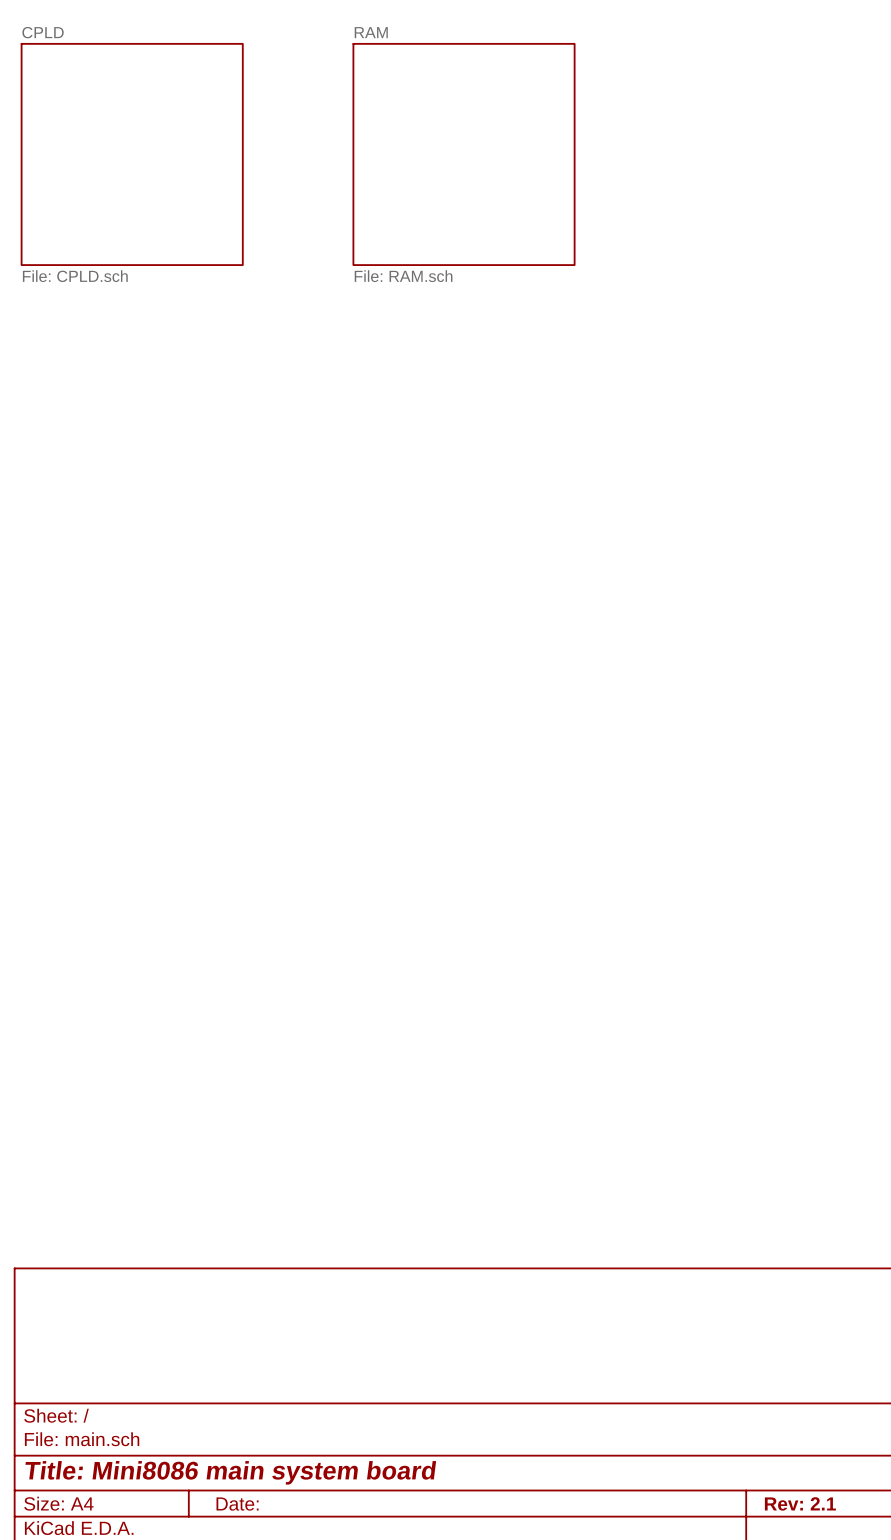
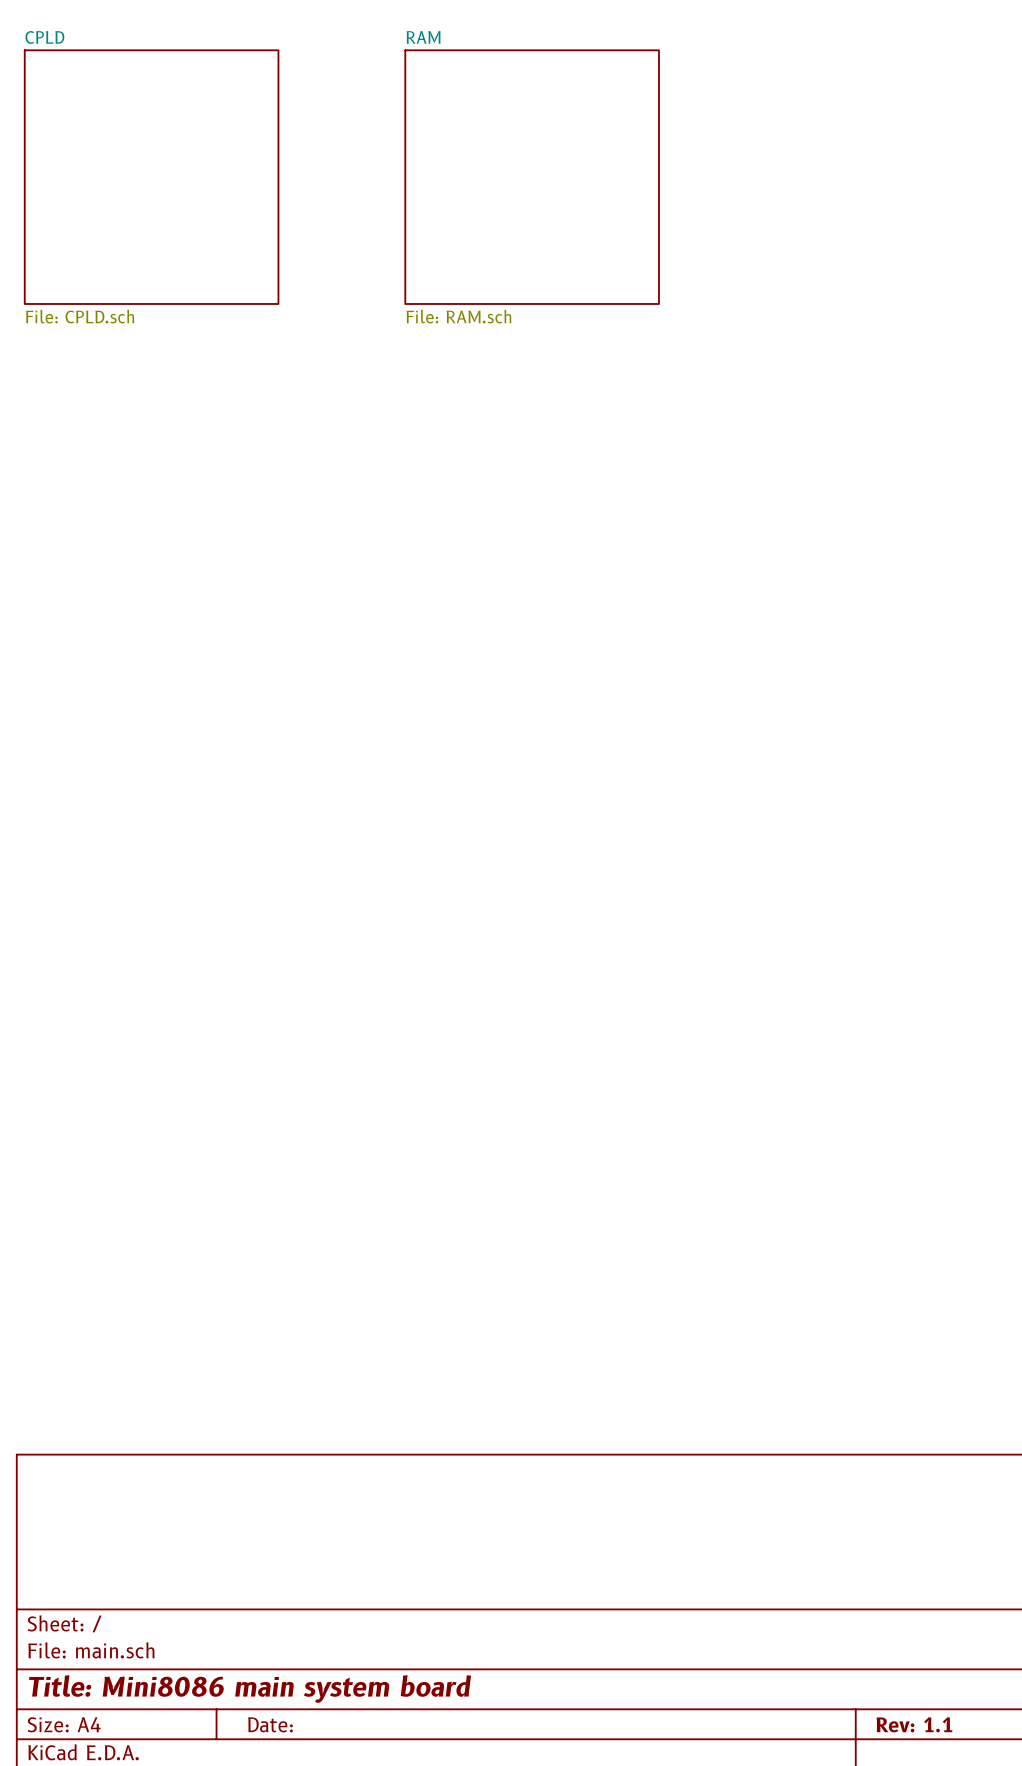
title block: Rev: 2.1 (800, 1503) -> Rev: 1.1 (914, 1724)

